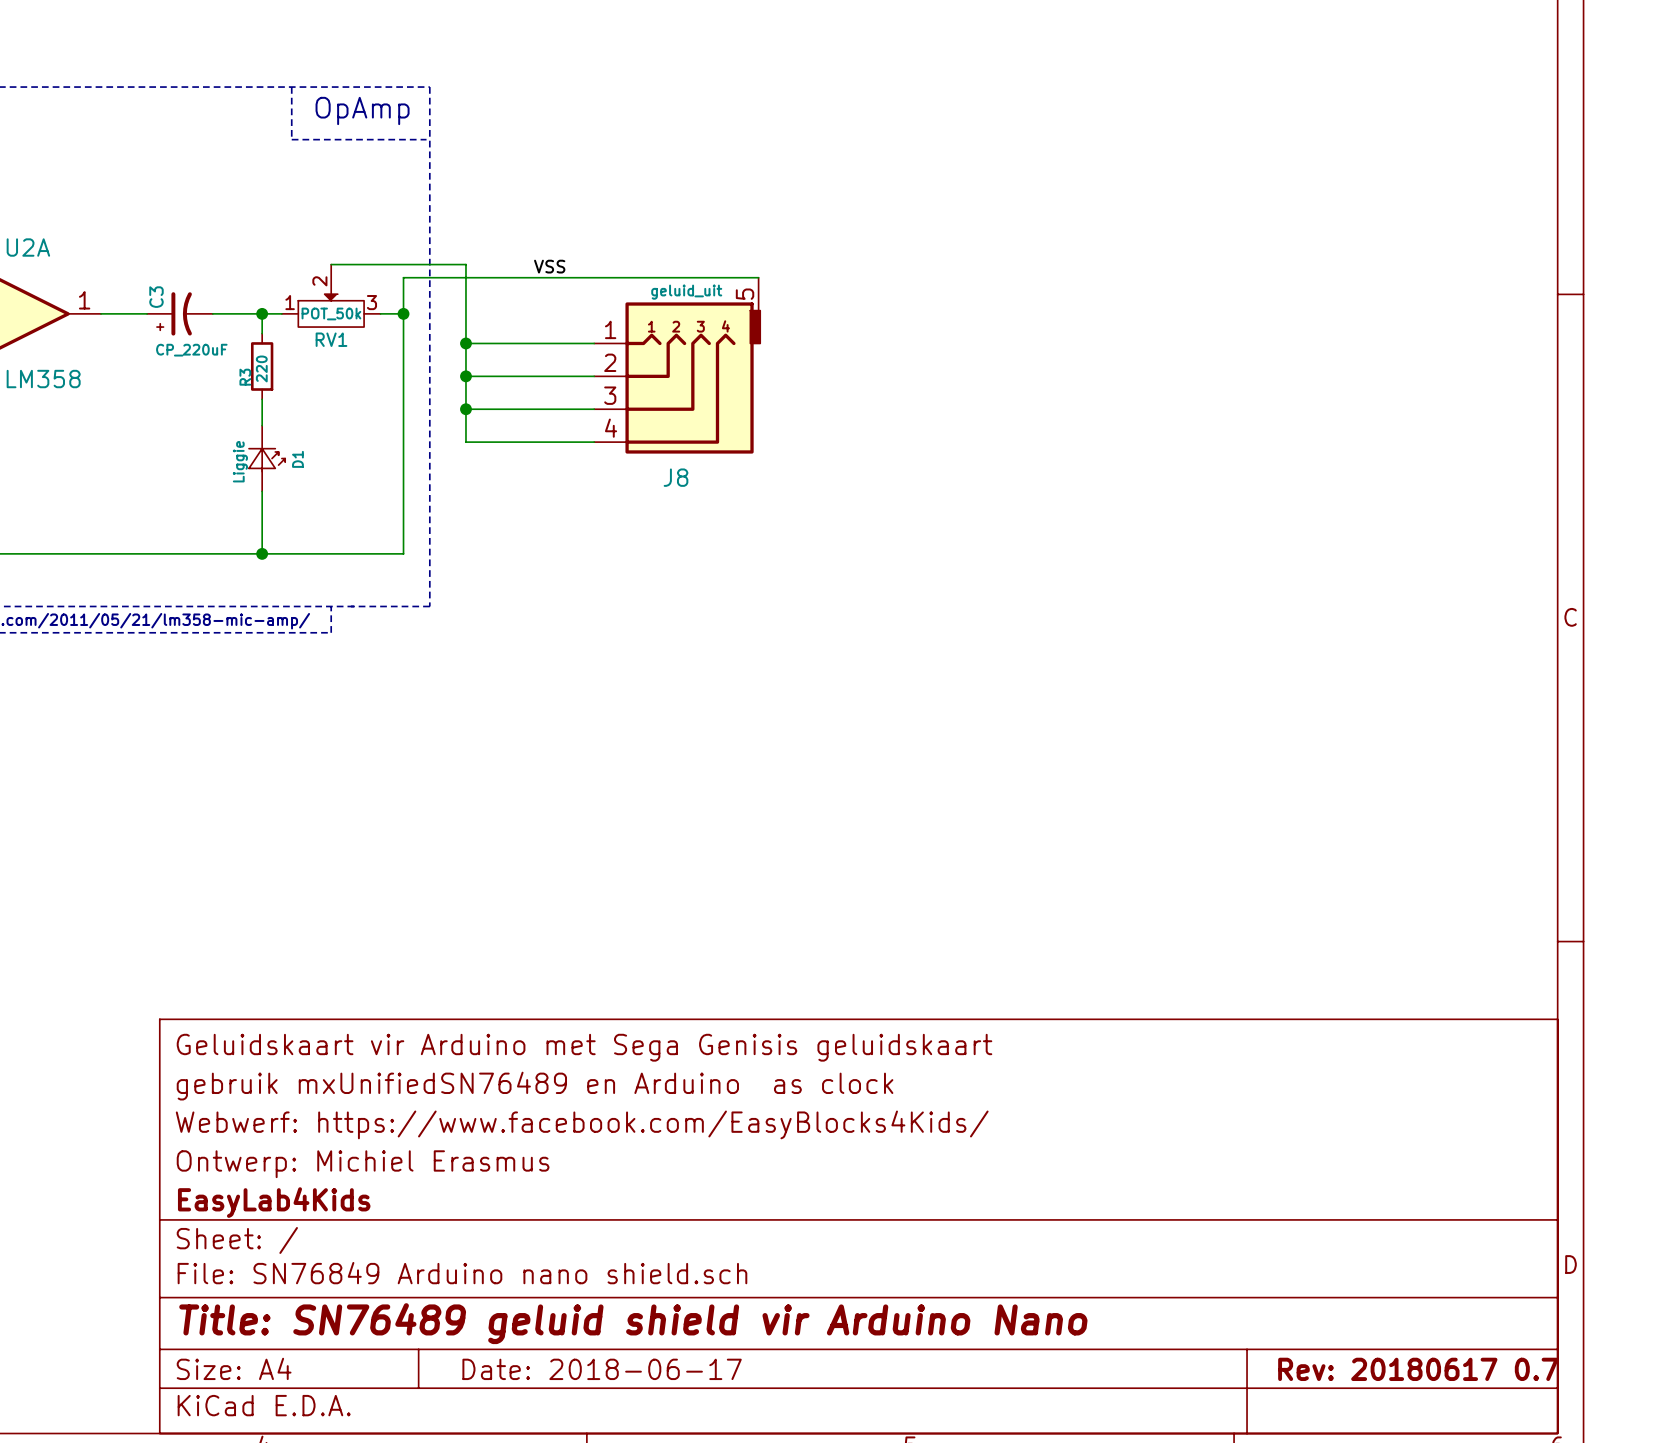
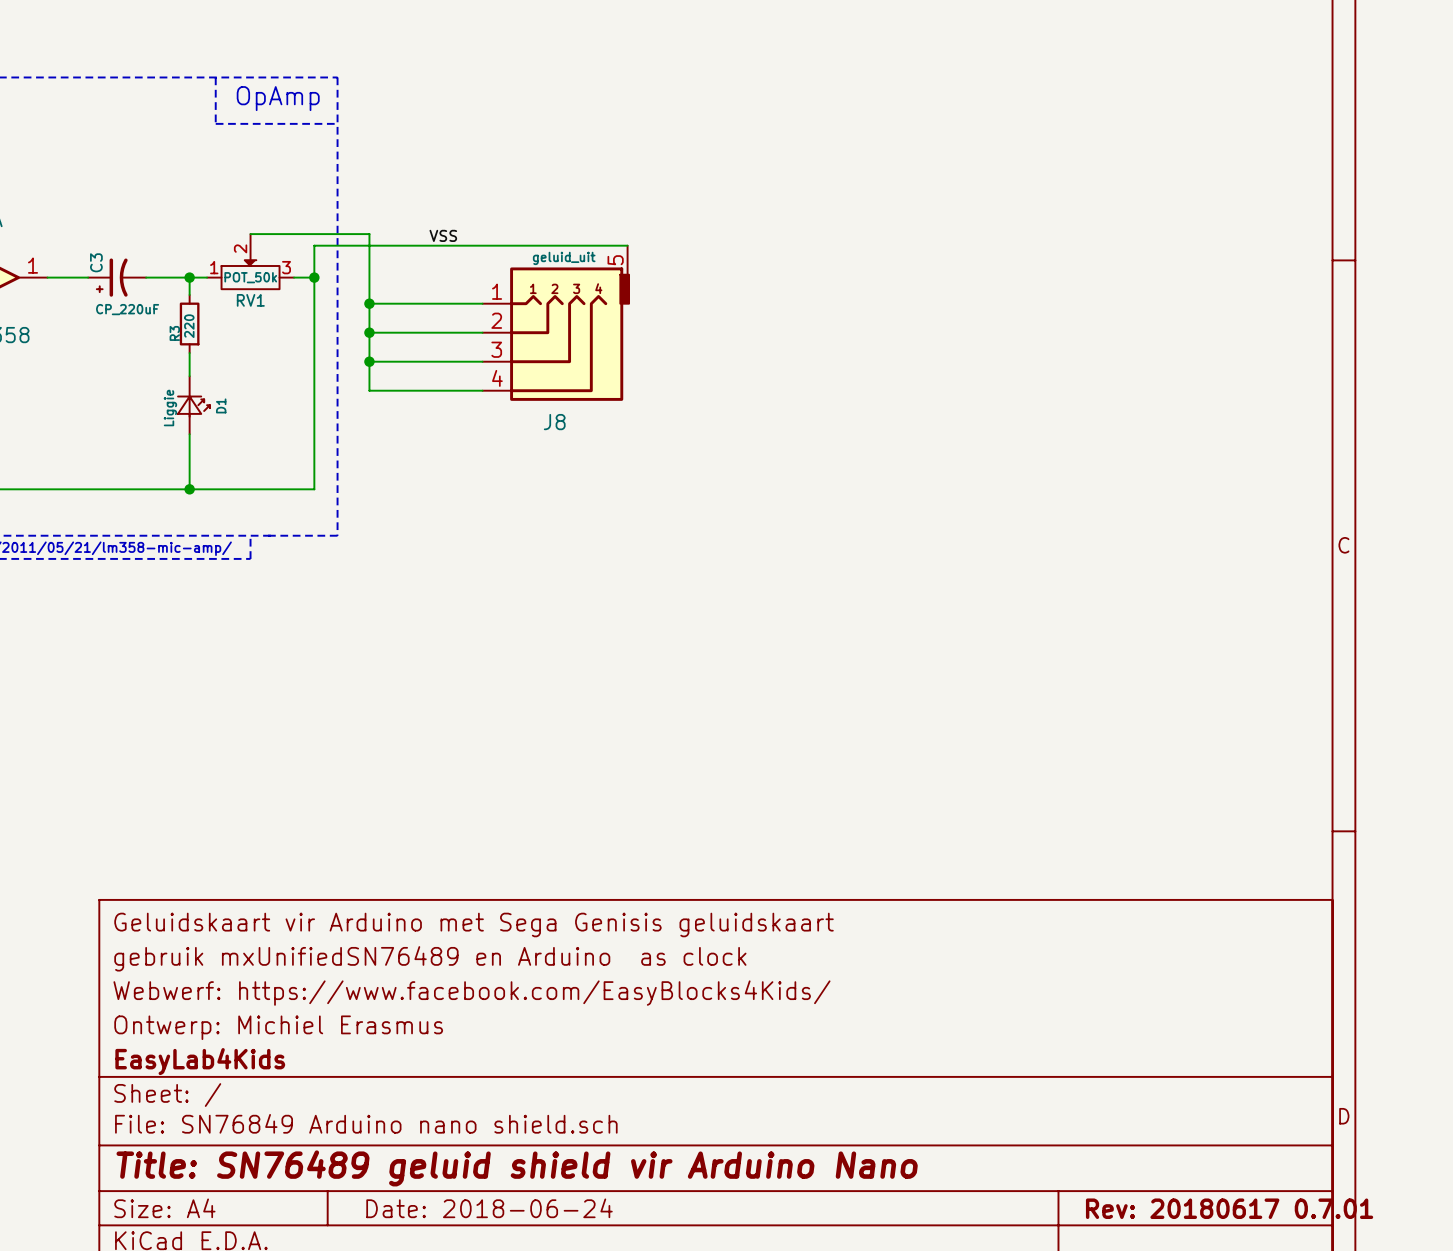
title block: Date: 2018-06-17 (602, 1369) -> Date: 2018-06-24 (489, 1208)
title block: Rev: 20180617 0.7 (1418, 1369) -> Rev: 20180617 0.7.01 (1229, 1208)

